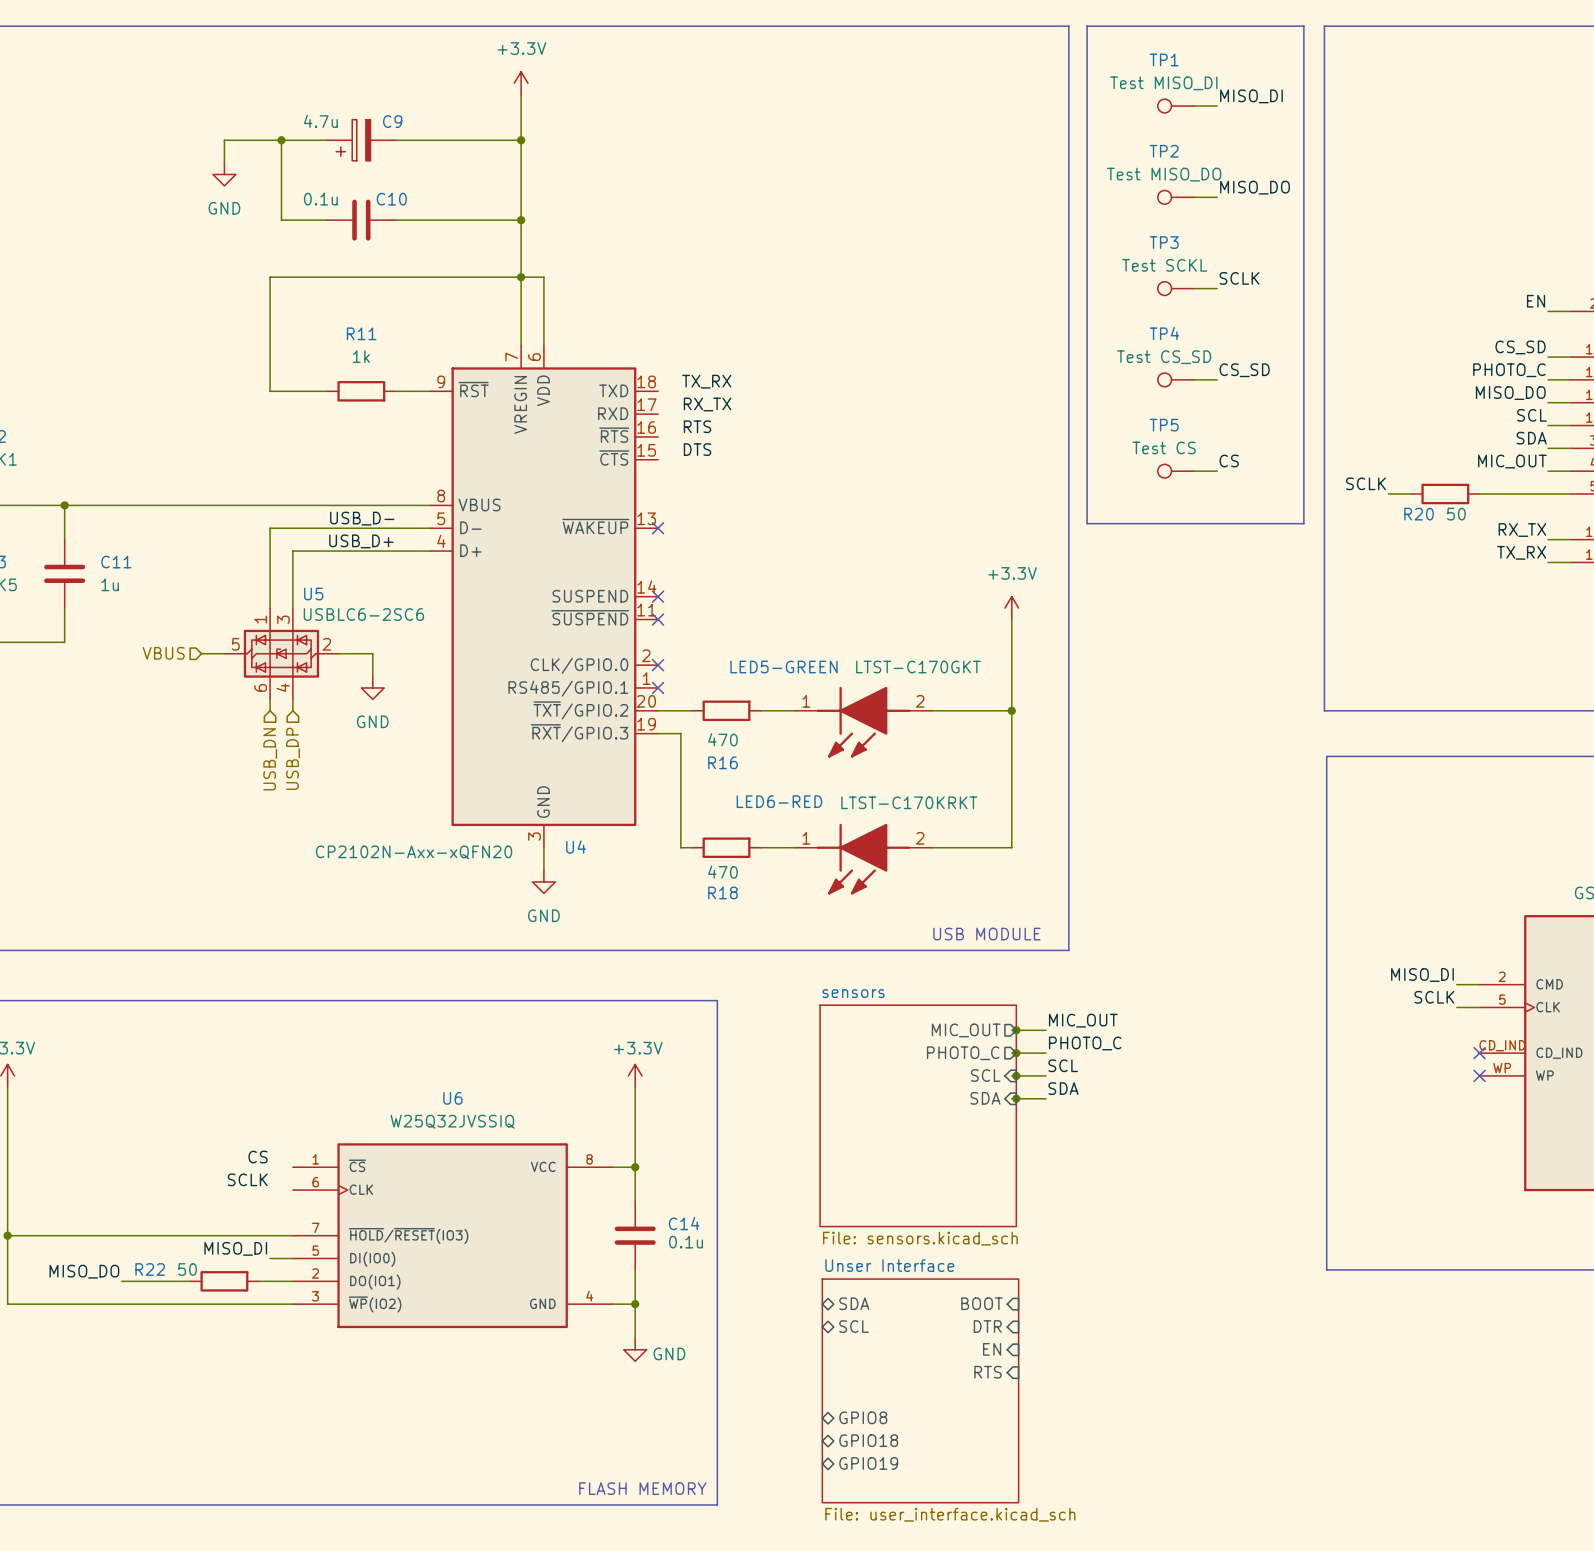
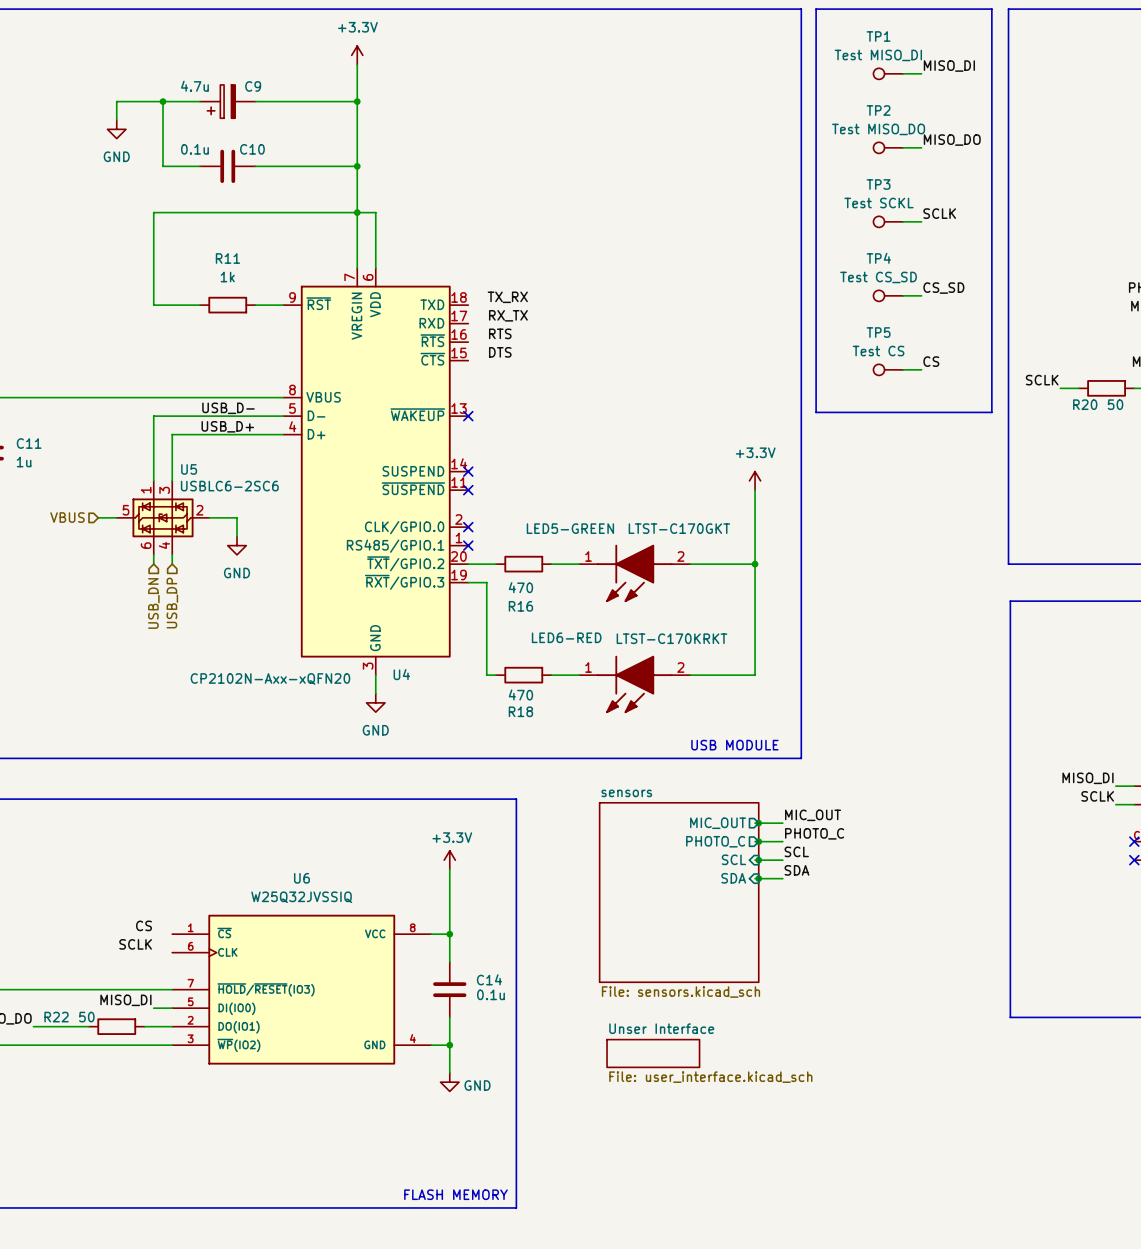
sheet pin: SDA (854, 1303) -> none
sheet pin: BOOT (982, 1303) -> none
sheet Unser Interface: none -> File: user_interface.kicad_sch (653, 1053)
sheet pin: SCL (854, 1326) -> none
sheet pin: DTR (987, 1326) -> none
sheet pin: EN (992, 1349) -> none
sheet pin: RTS (988, 1372) -> none
sheet Unser Interface: File: user_interface.kicad_sch (920, 1390) -> none
sheet pin: GPIO8 (863, 1417) -> none
sheet pin: GPIO18 (868, 1440) -> none
sheet pin: GPIO19 (868, 1463) -> none

